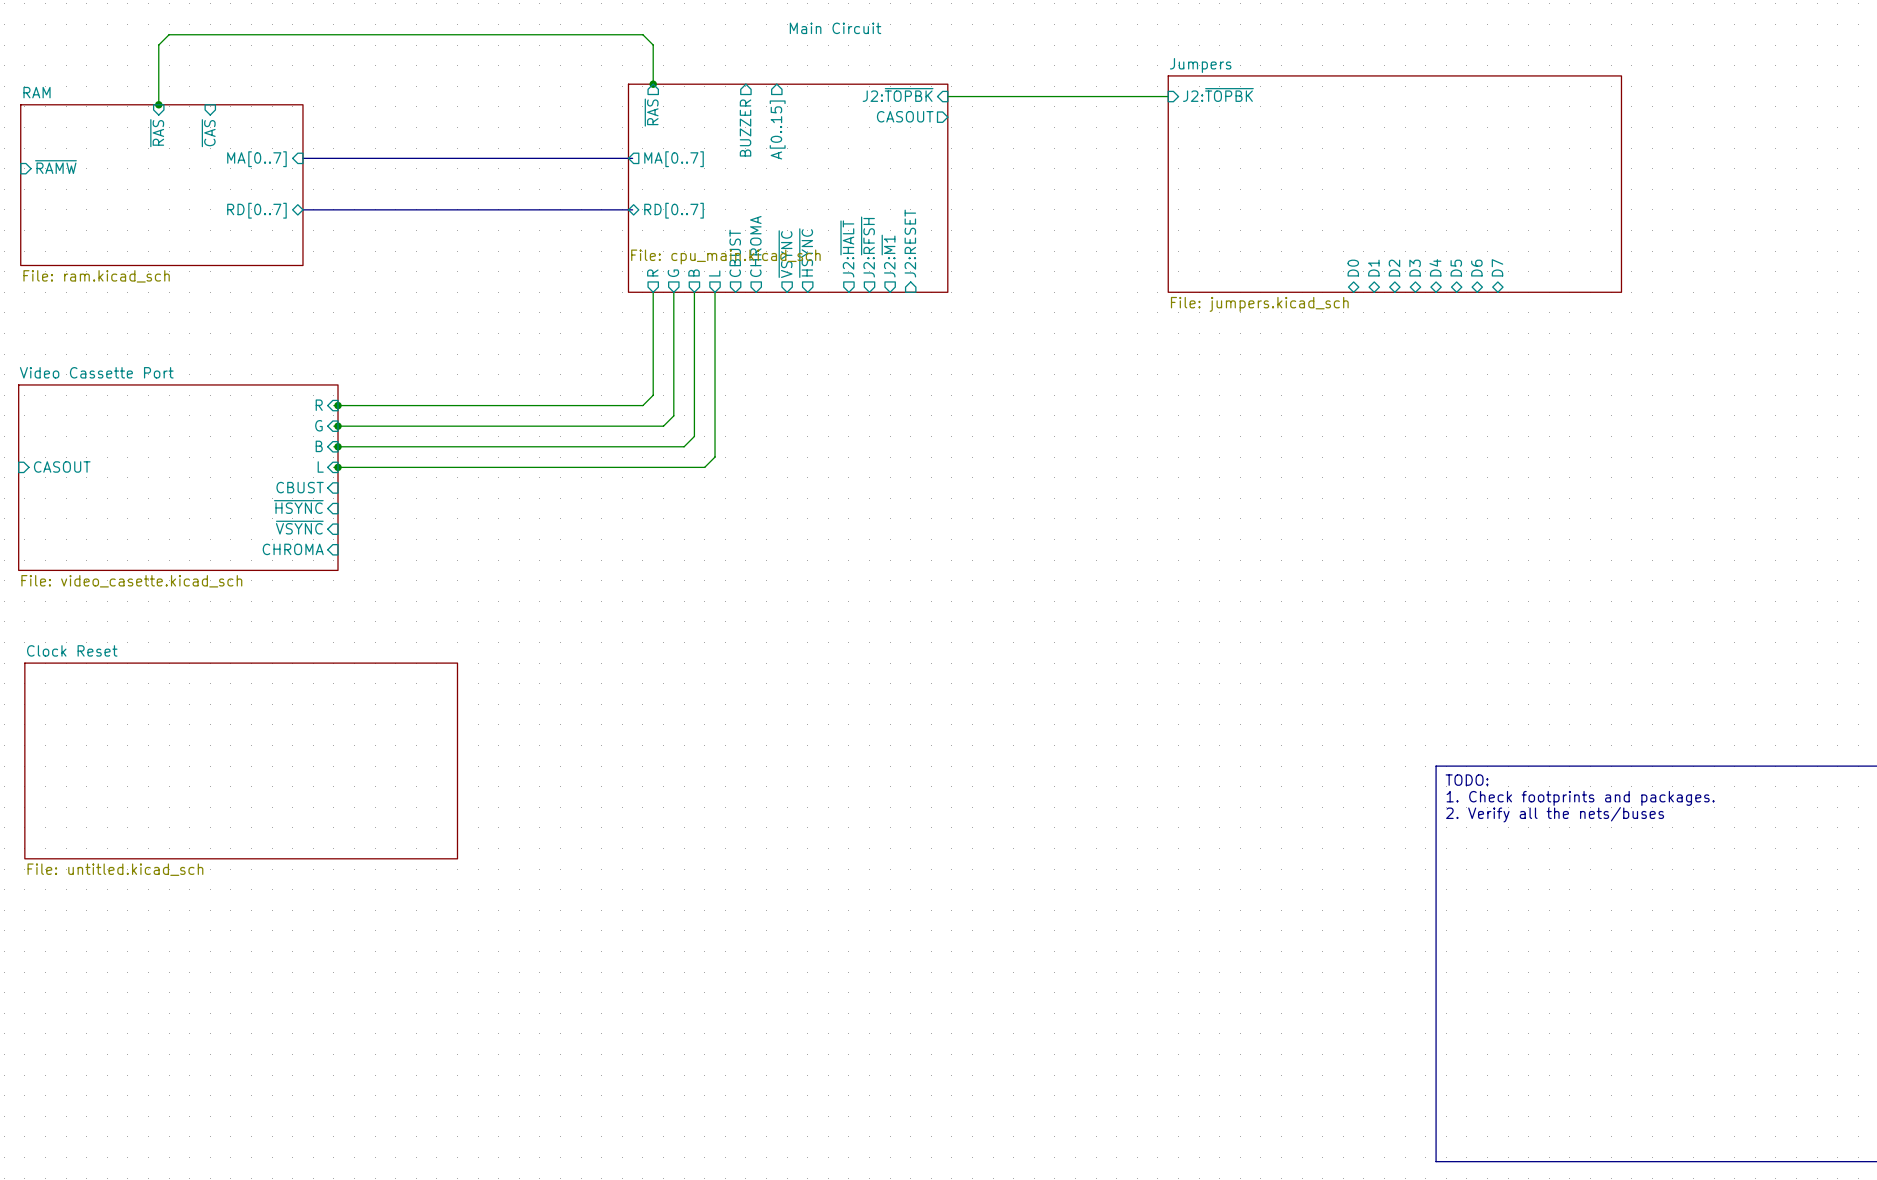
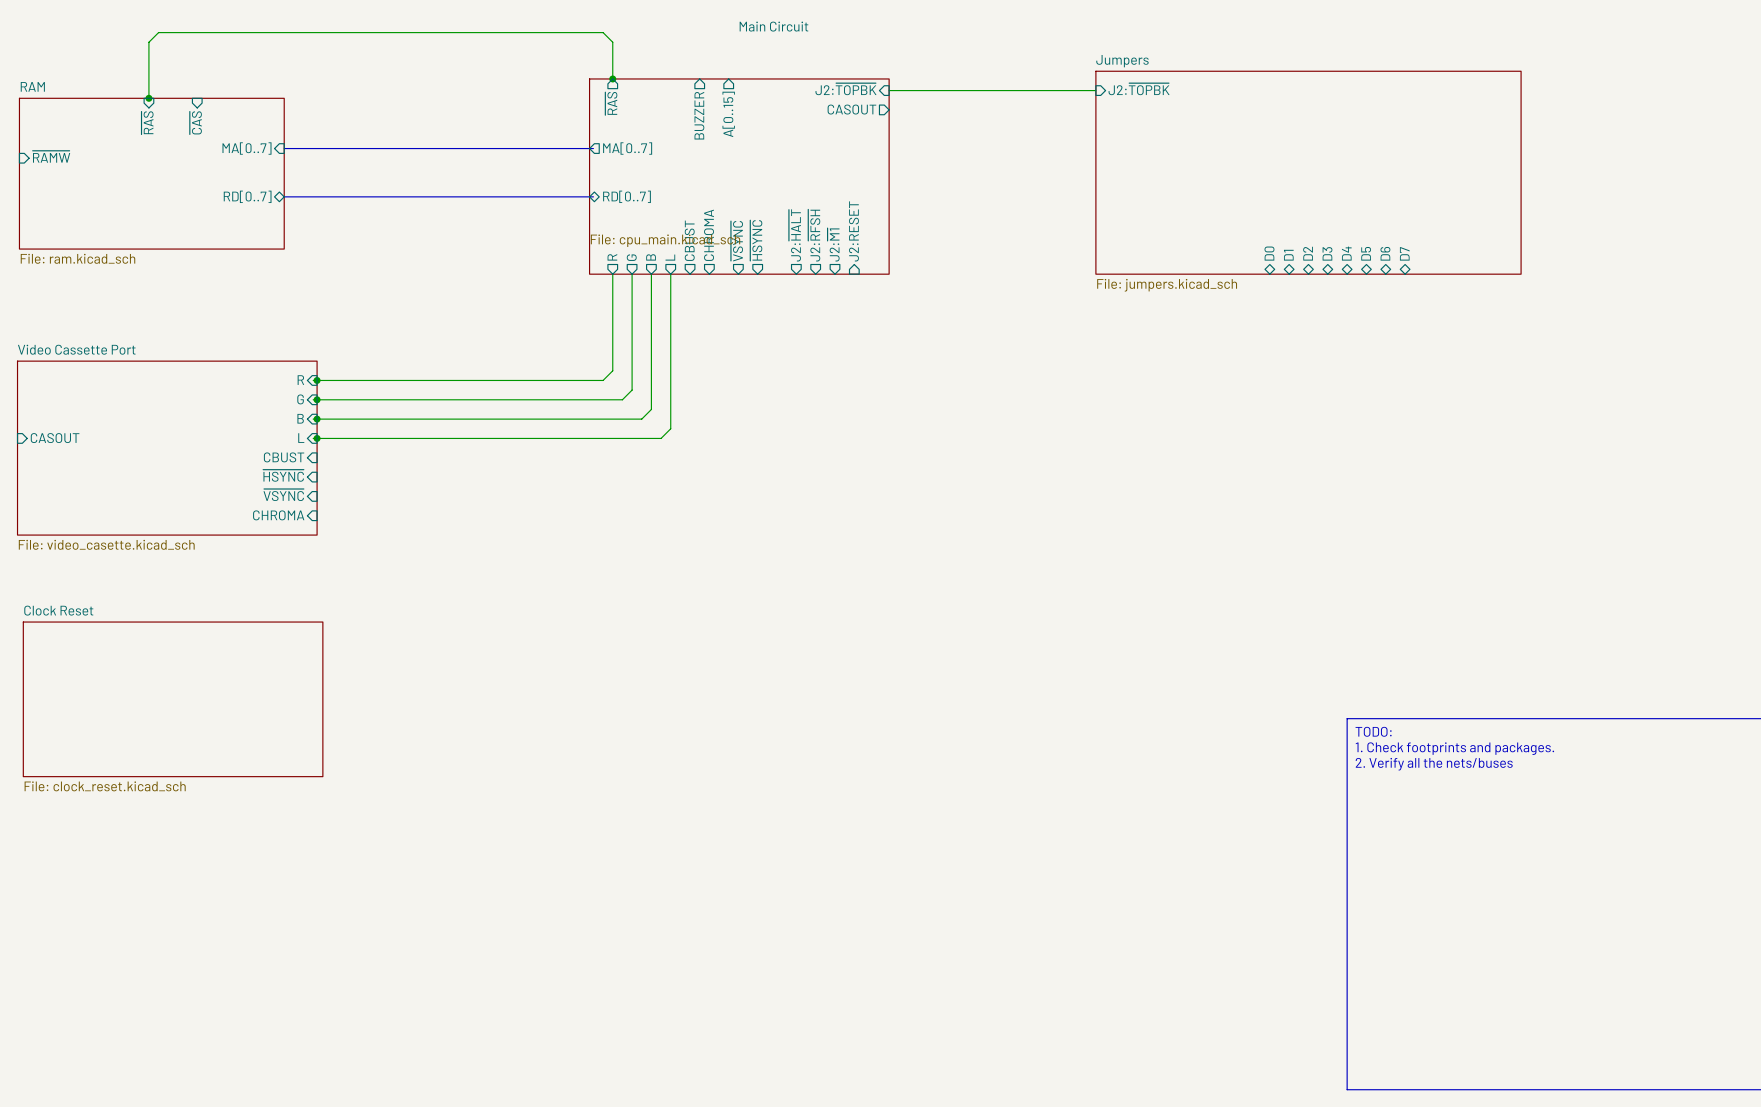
sheet Clock Reset: none -> File: clock_reset.kicad_sch (173, 699)
sheet Clock Reset: File: untitled.kicad_sch (241, 760) -> none

